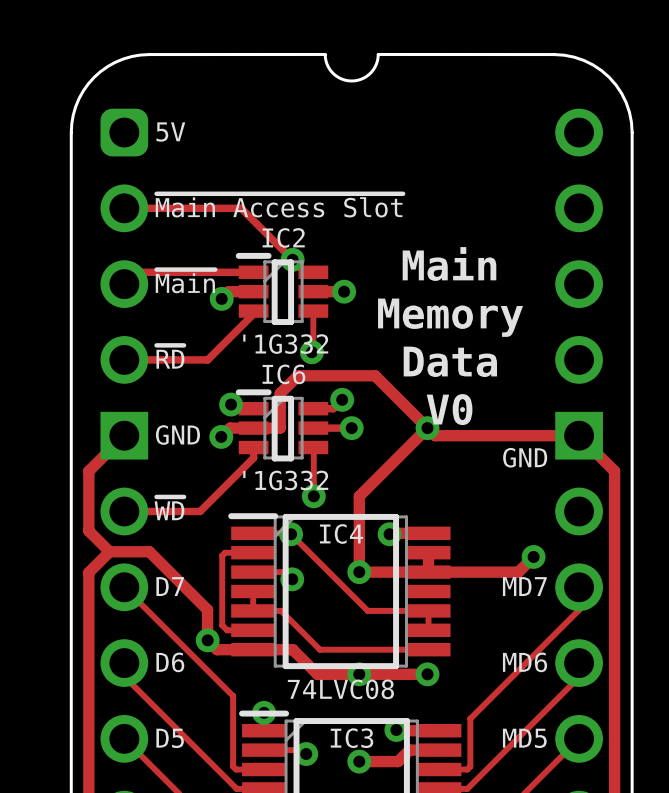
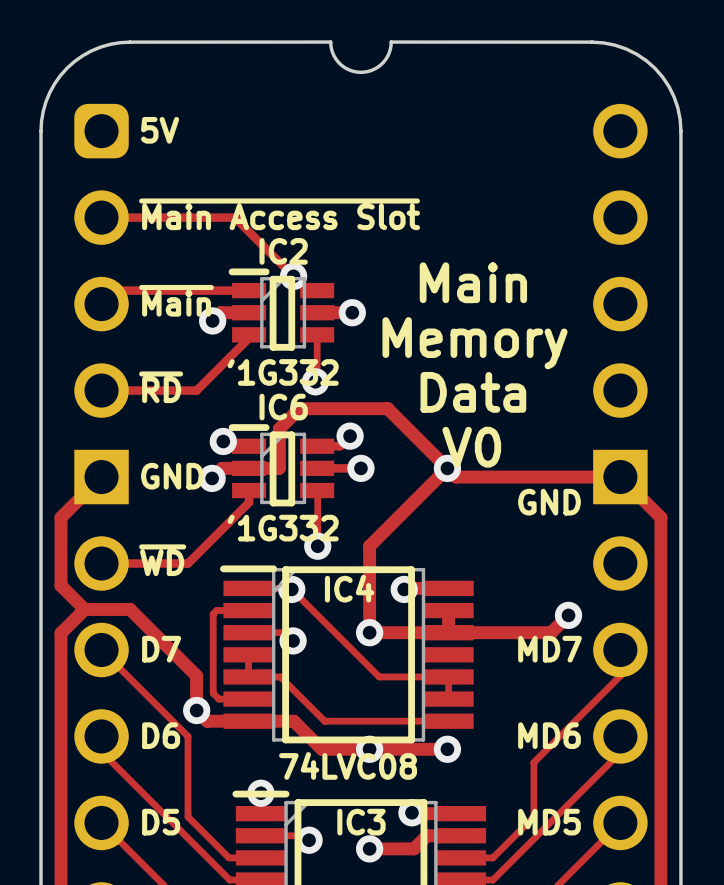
track: (200, 663) (233, 696) (233, 766) -> (188, 736) (188, 816) (225, 854)
track: (503, 685) (470, 718) (470, 766) -> (533, 762) (533, 816) (496, 854)

